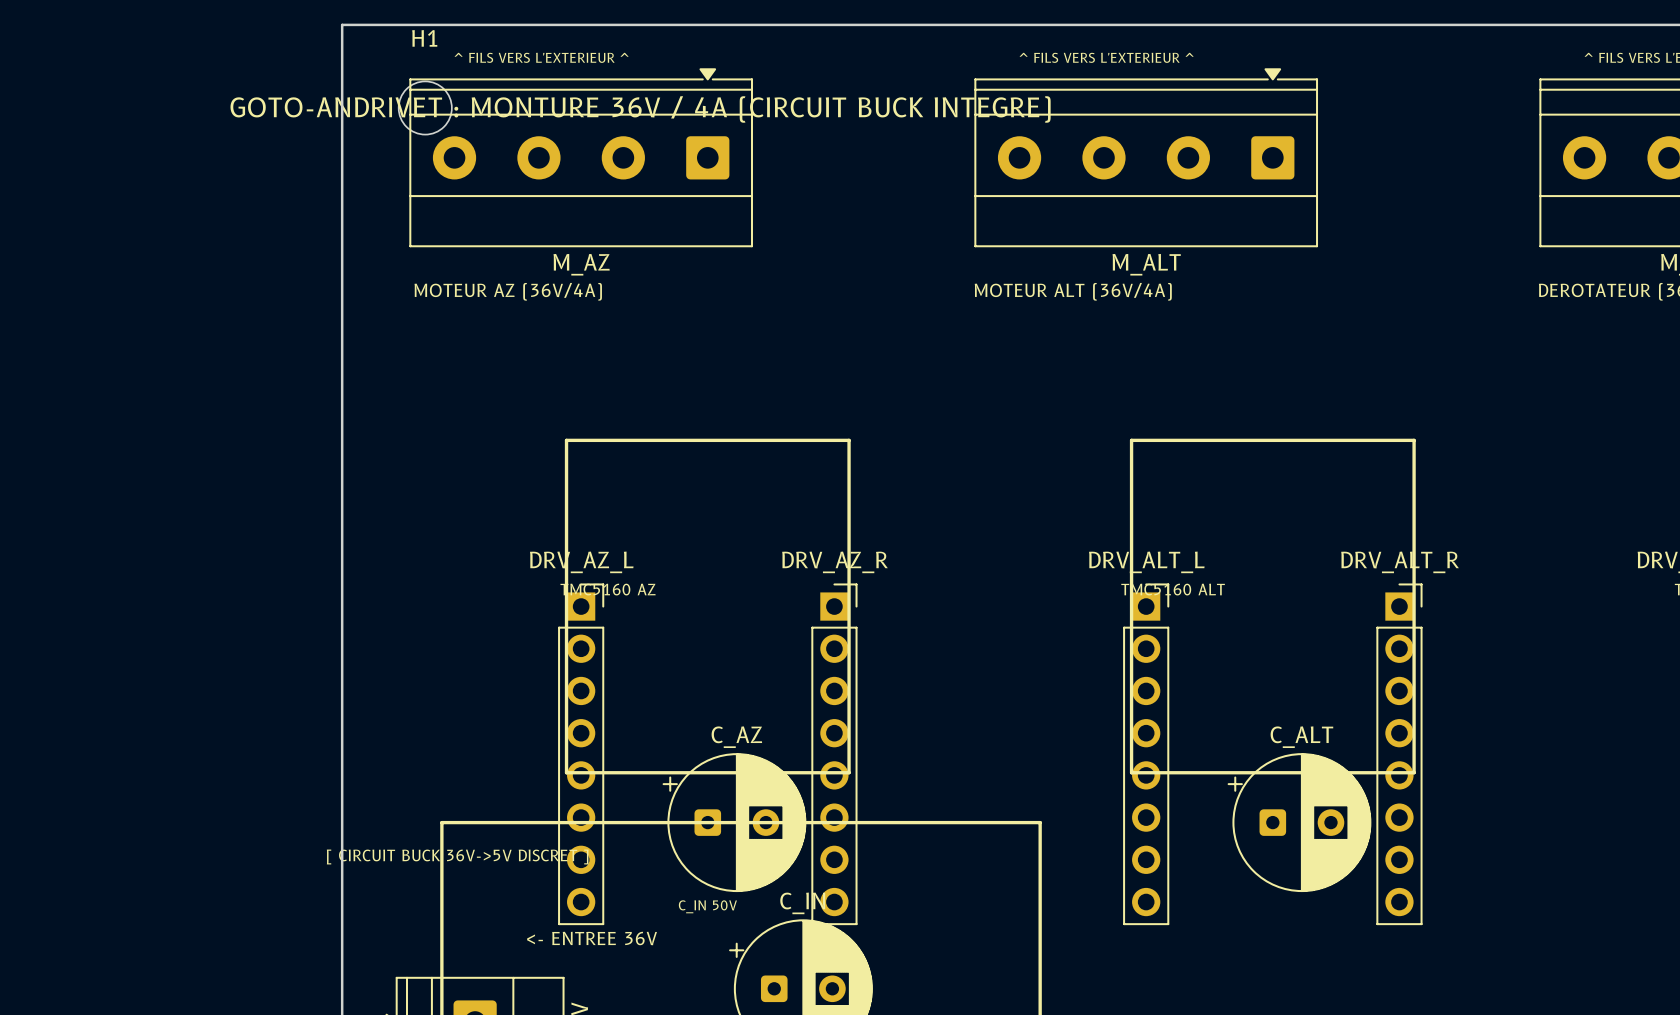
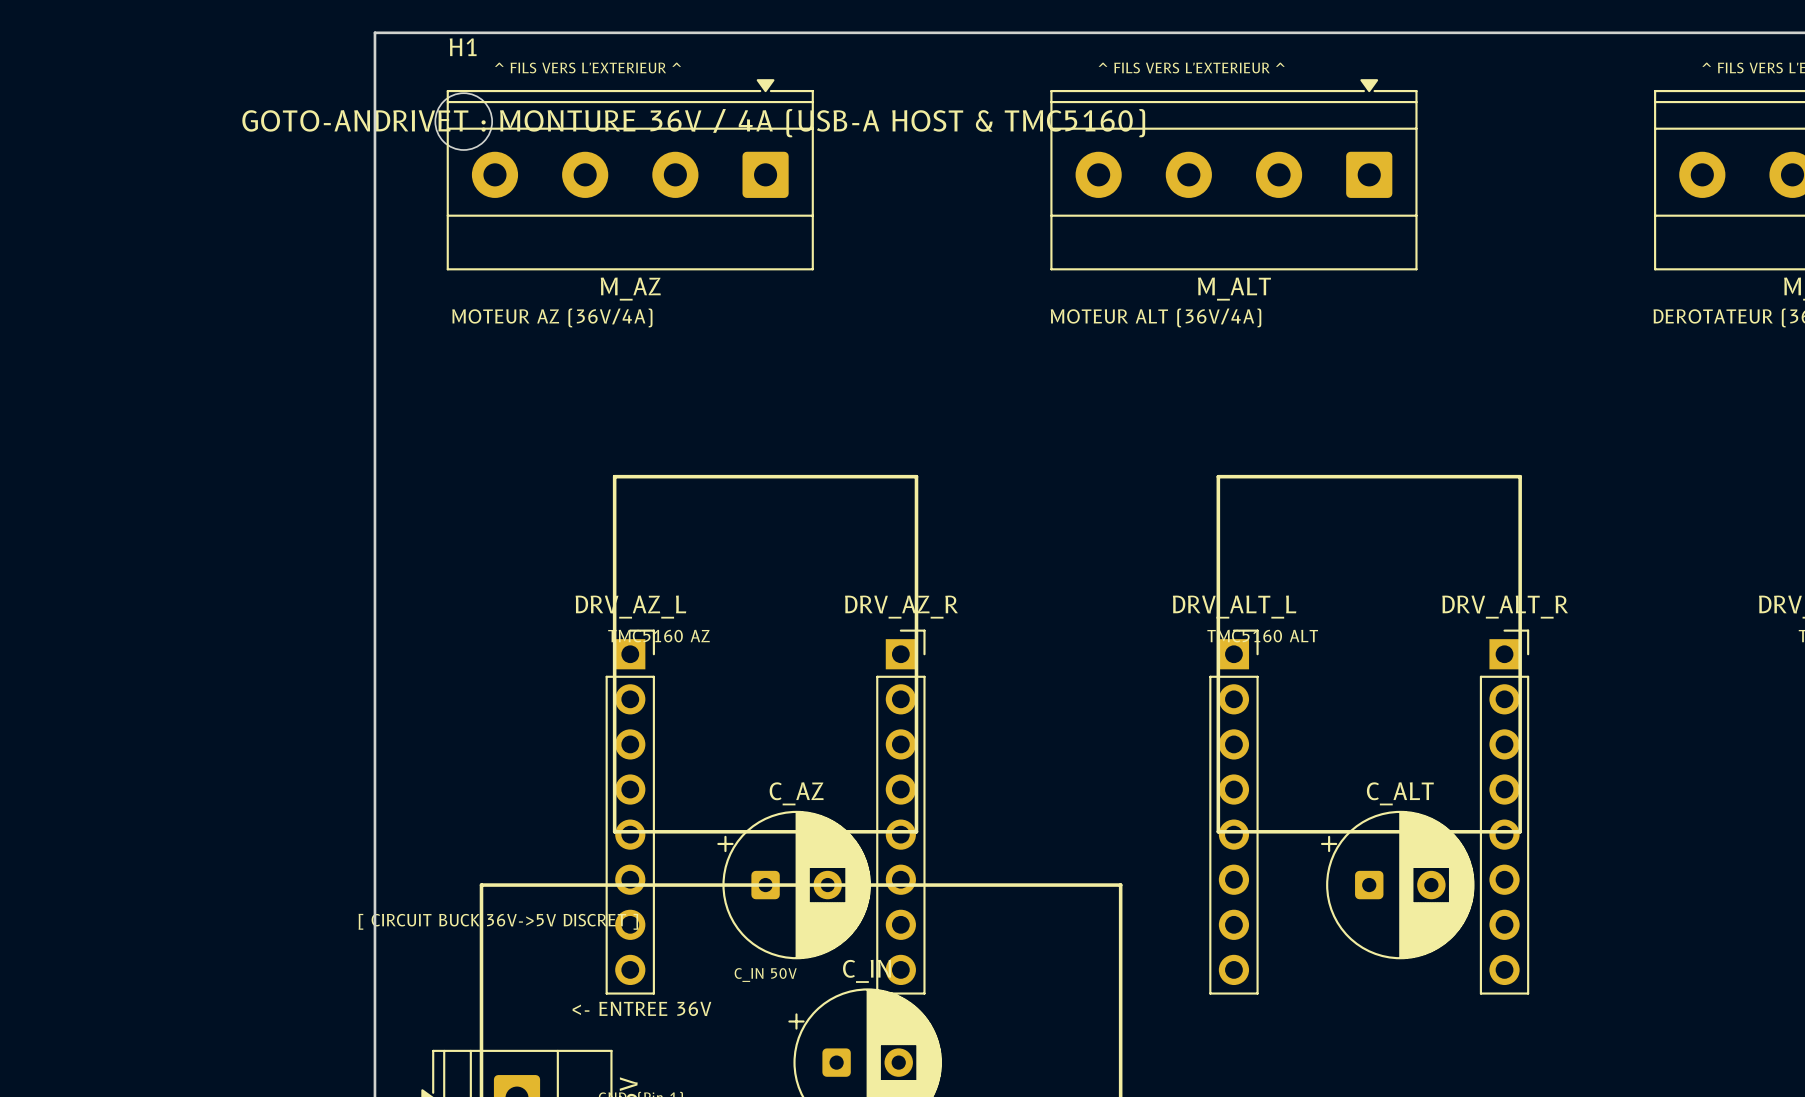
text: GOTO-ANDRIVET : MONTURE 36V / 4A (CIRCUIT BUCK INTEGRE) (640, 109) -> GOTO-ANDRIVET : MONTURE 36V / 4A (USB-A HOST & TMC5160) (693, 123)

